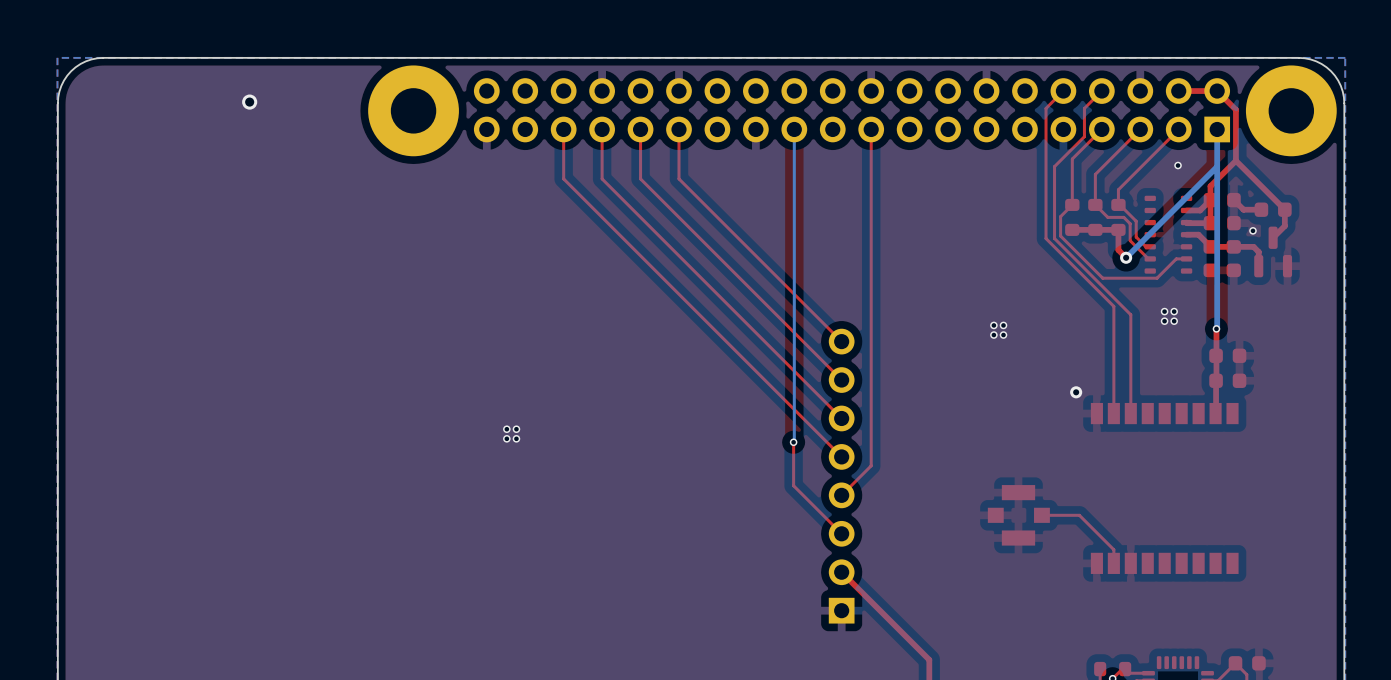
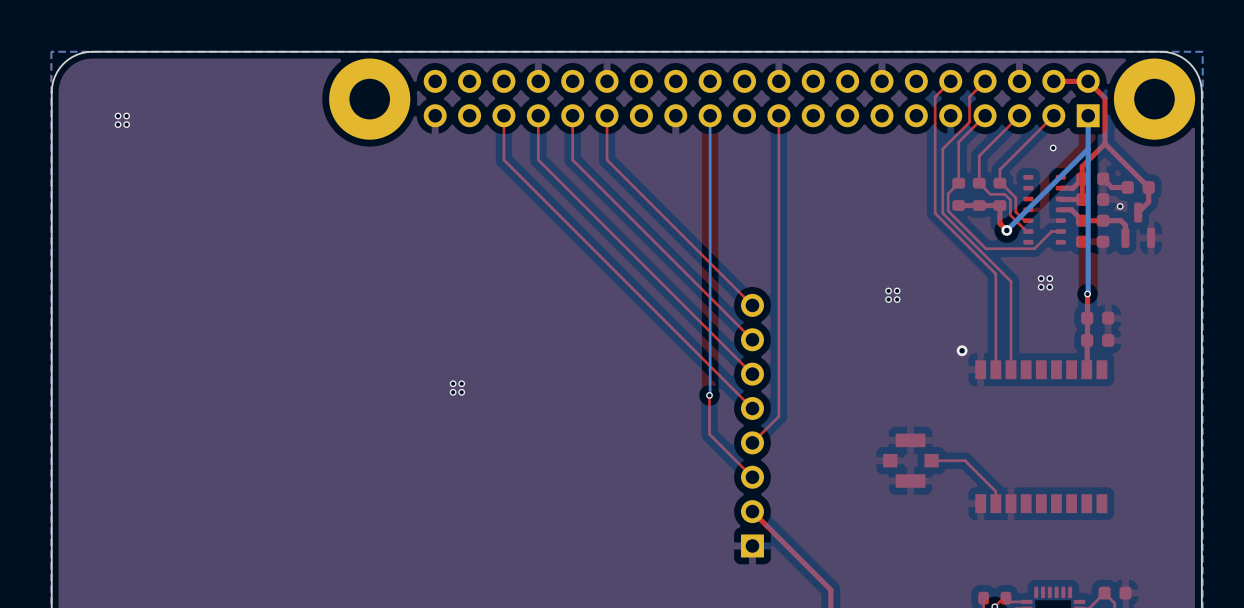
via: (249, 102) -> none
via: none -> (118, 116)
via: none -> (126, 116)
via: none -> (118, 124)
via: none -> (126, 124)

